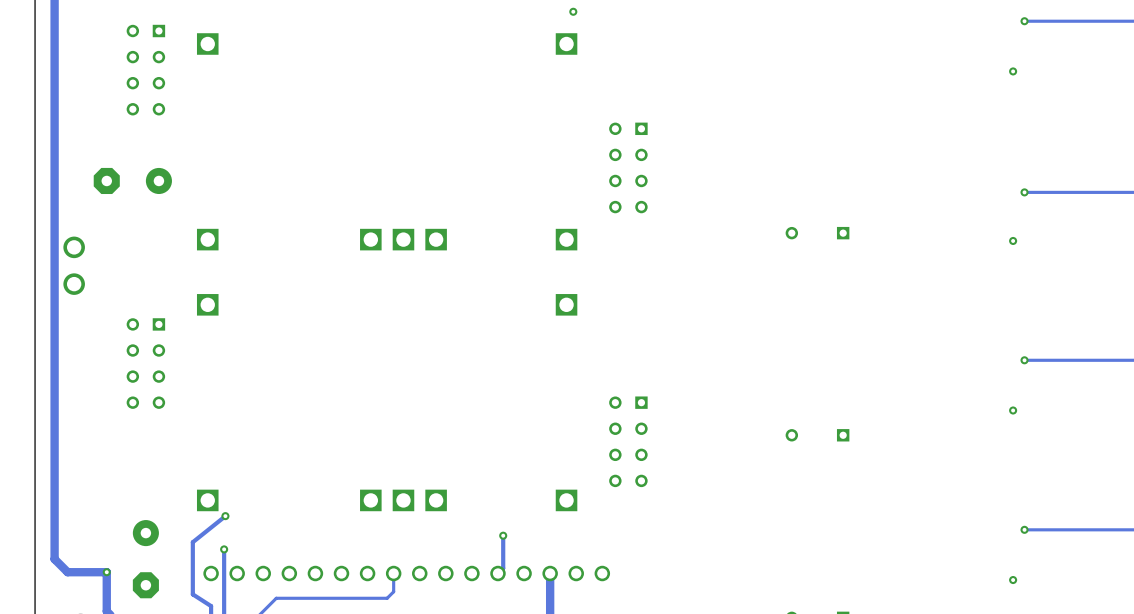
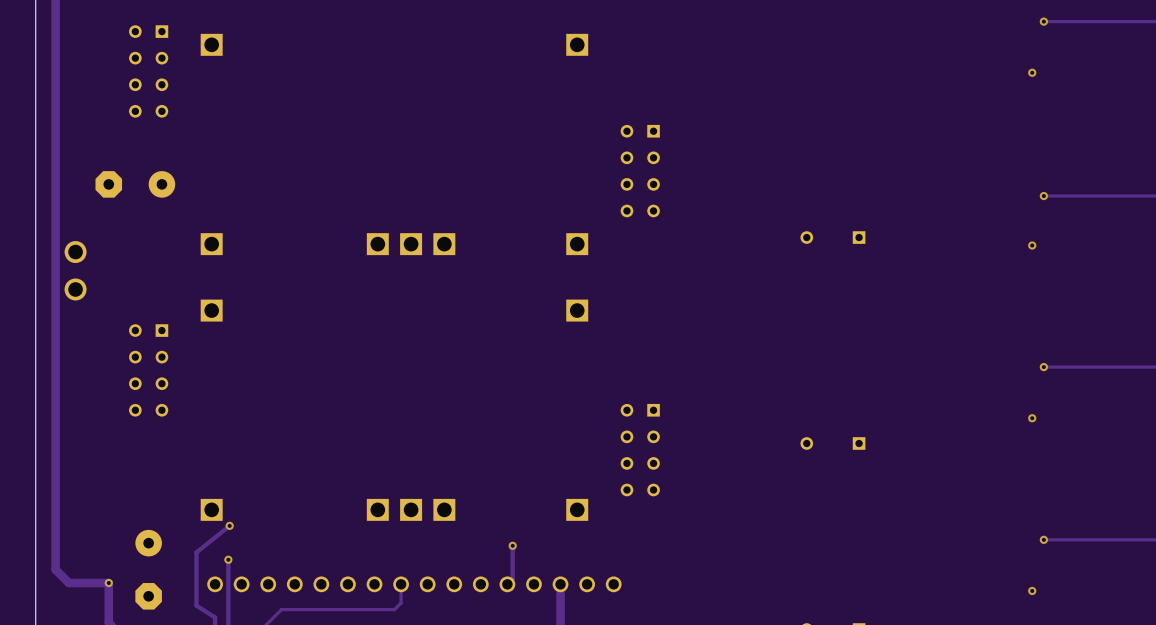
via: (573, 11) -> none

